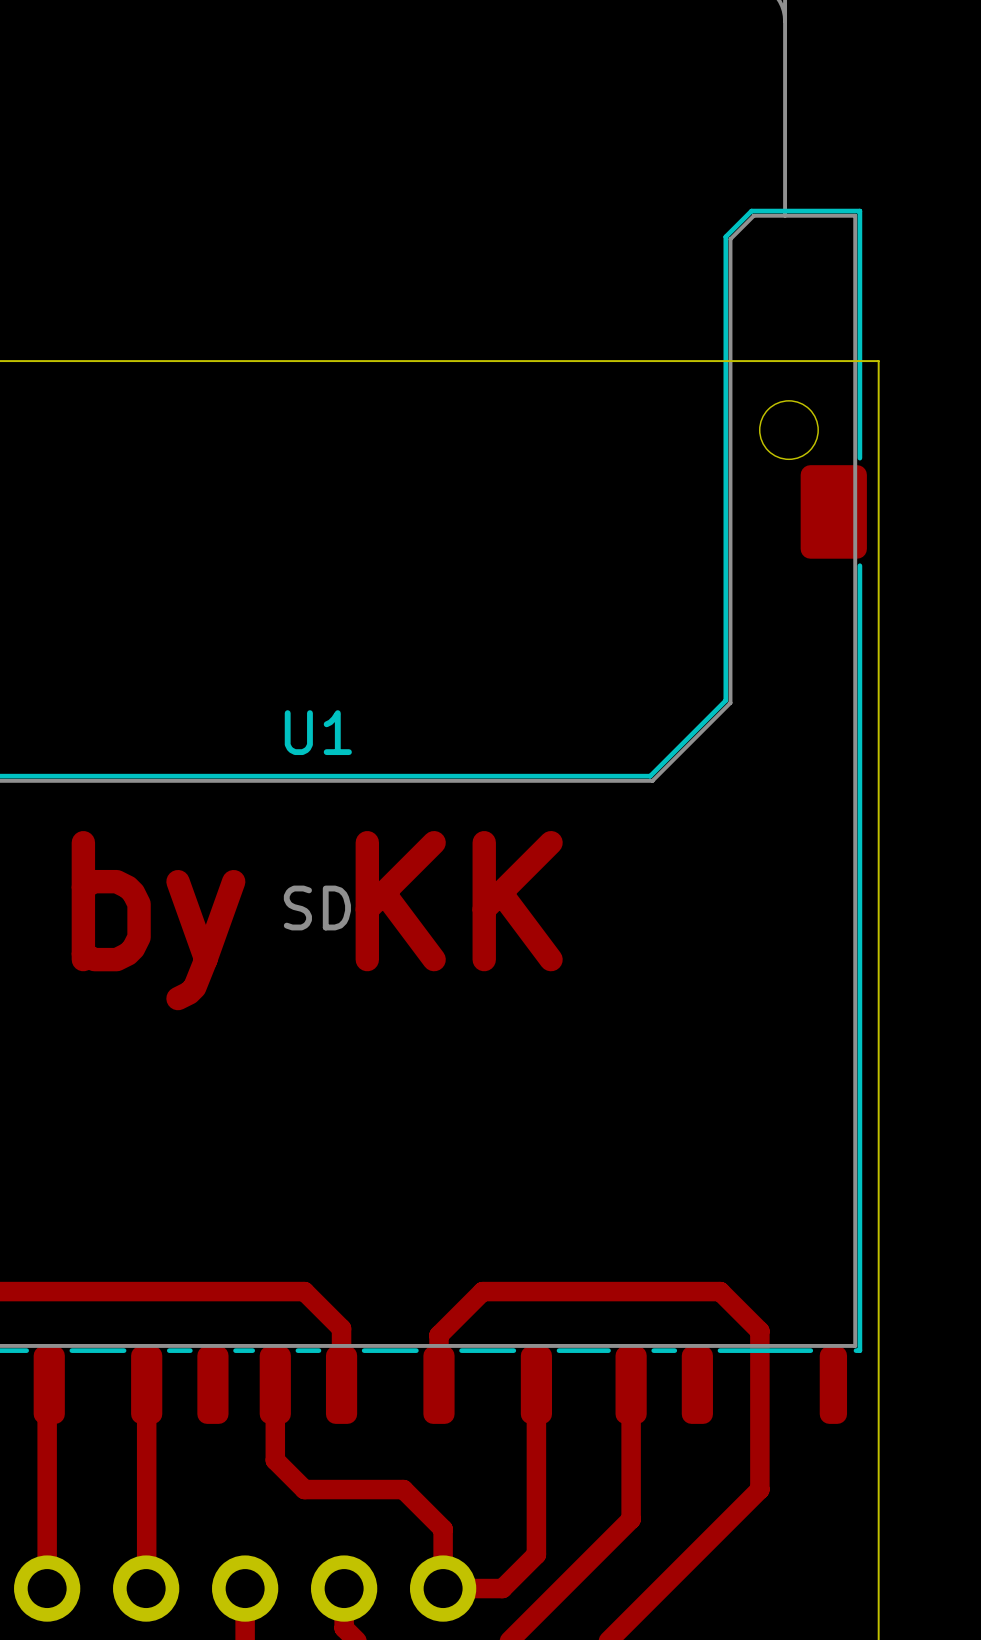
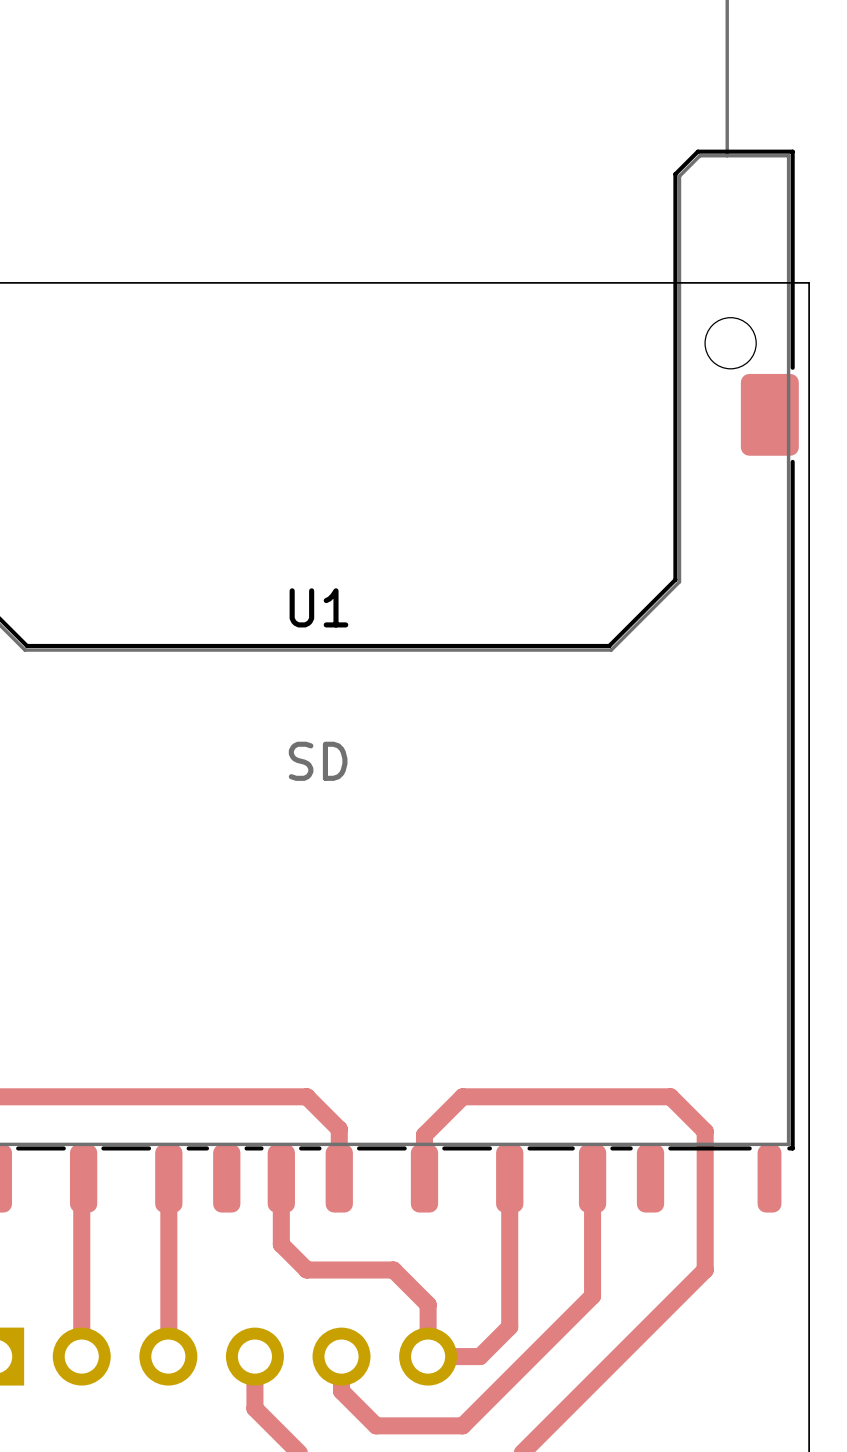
text: by KK (317, 920) -> none

